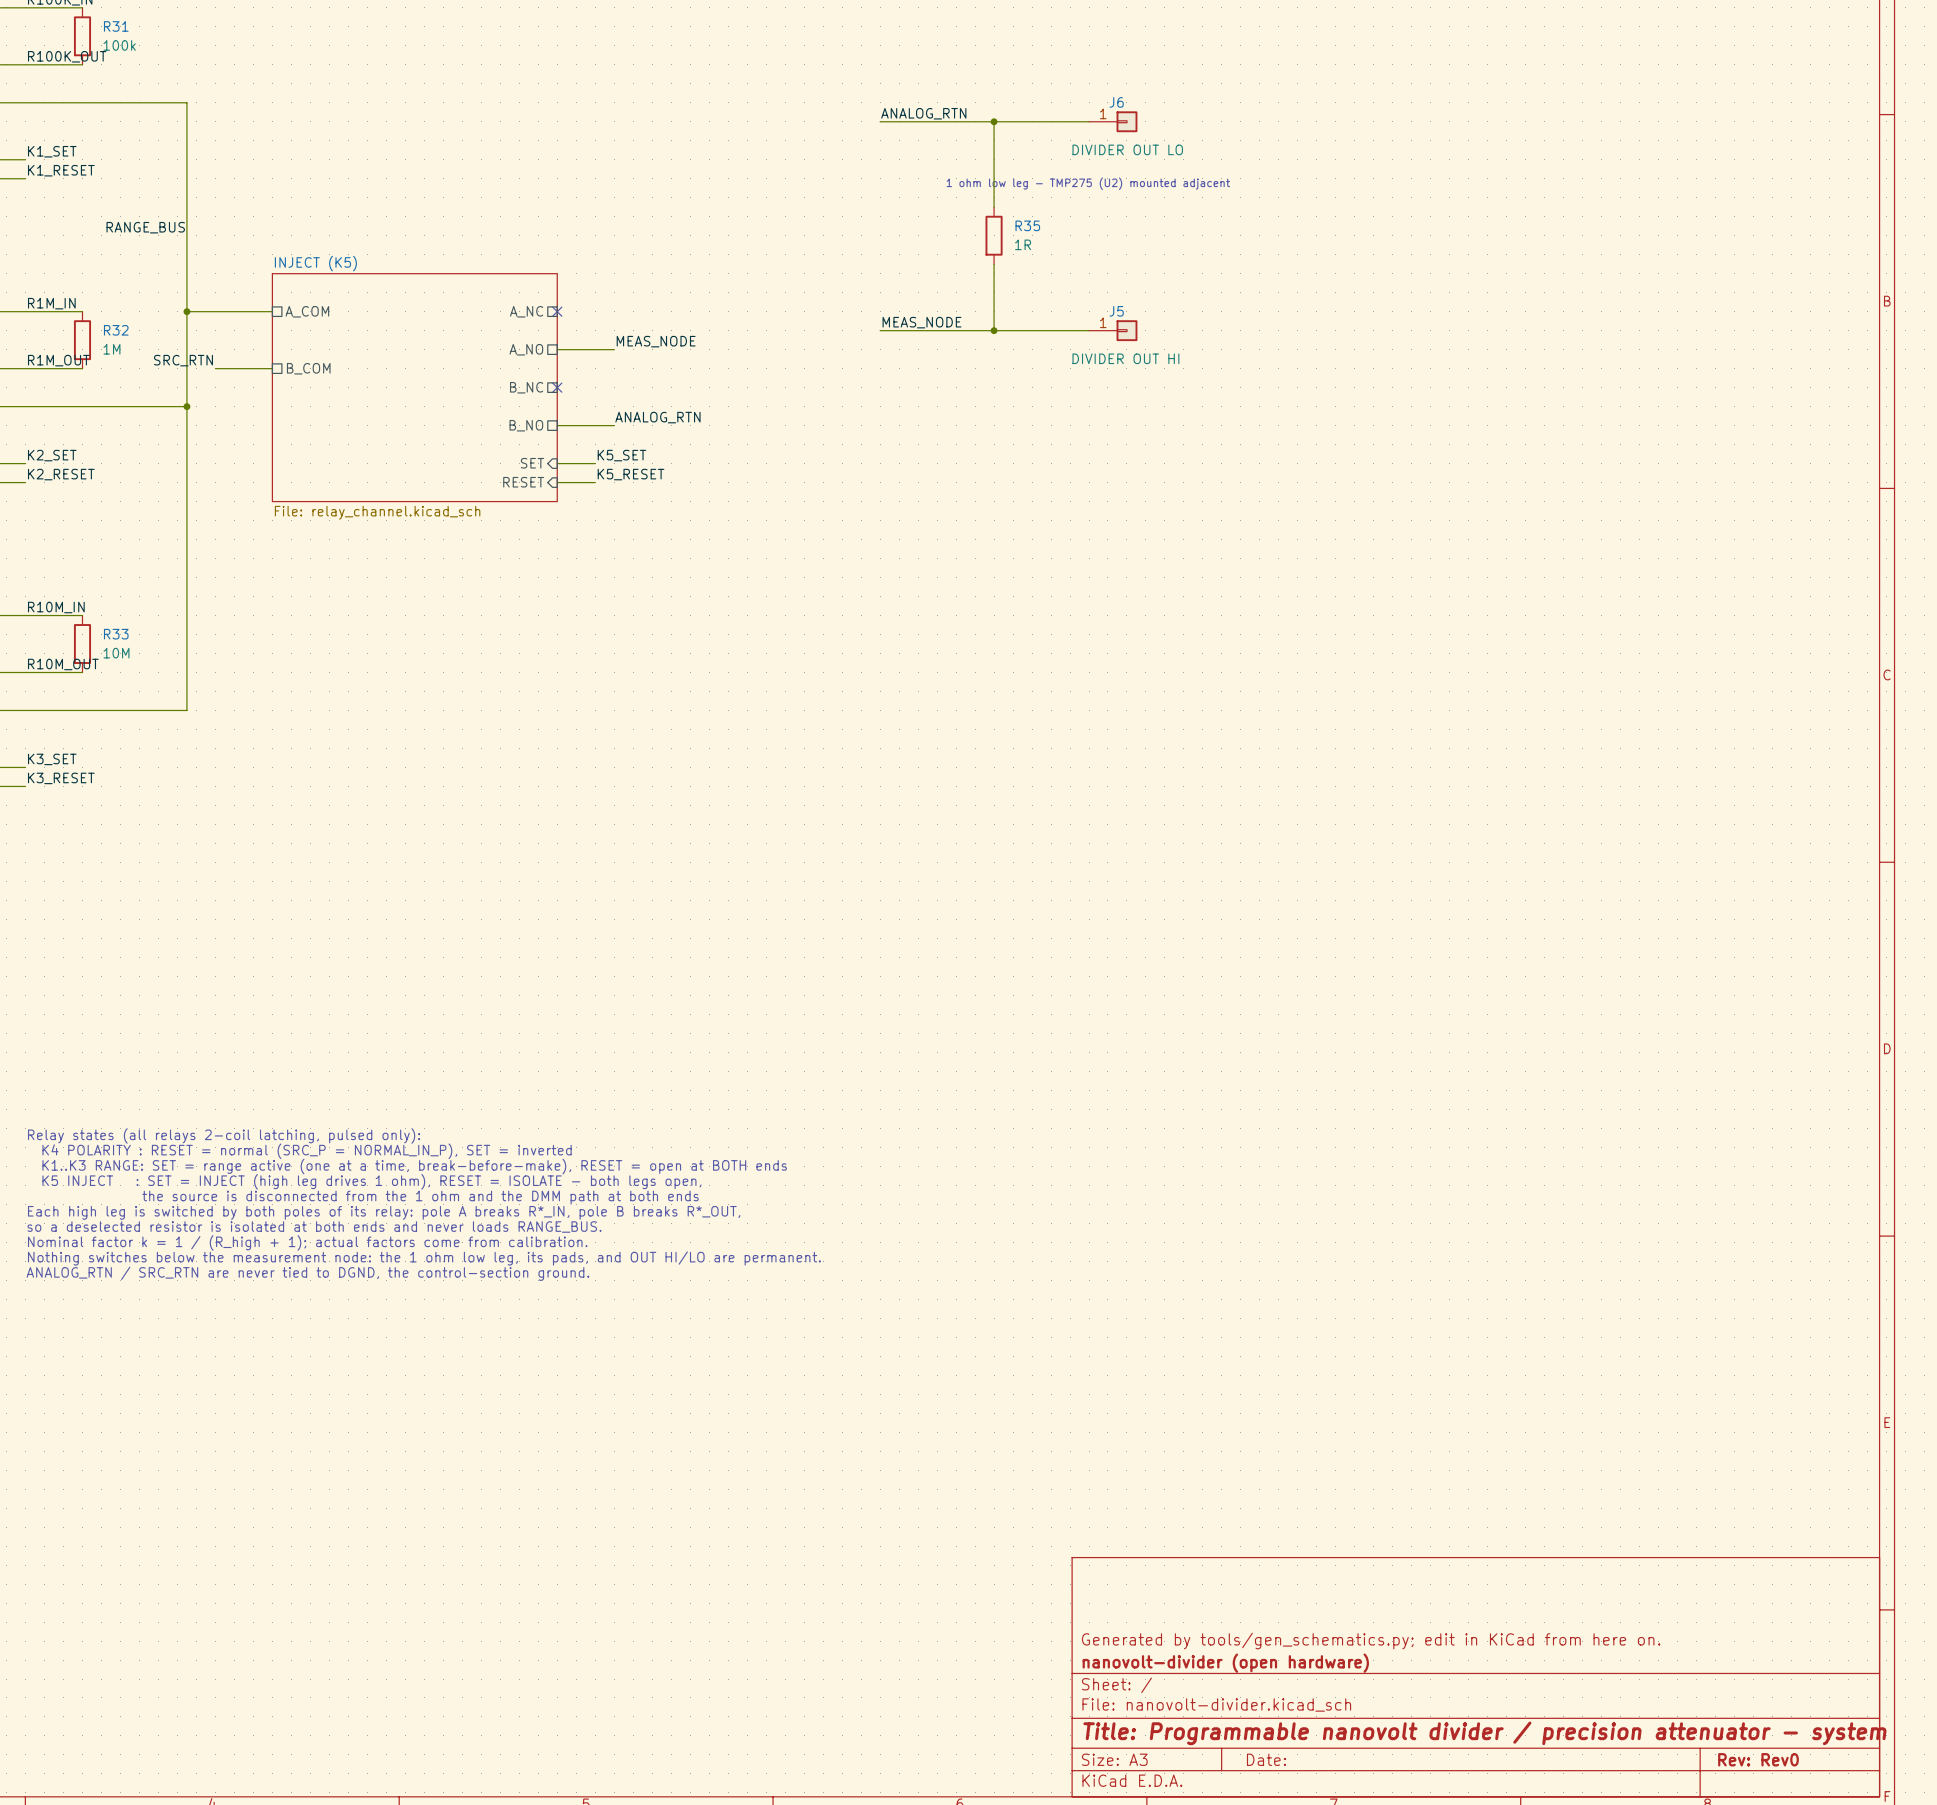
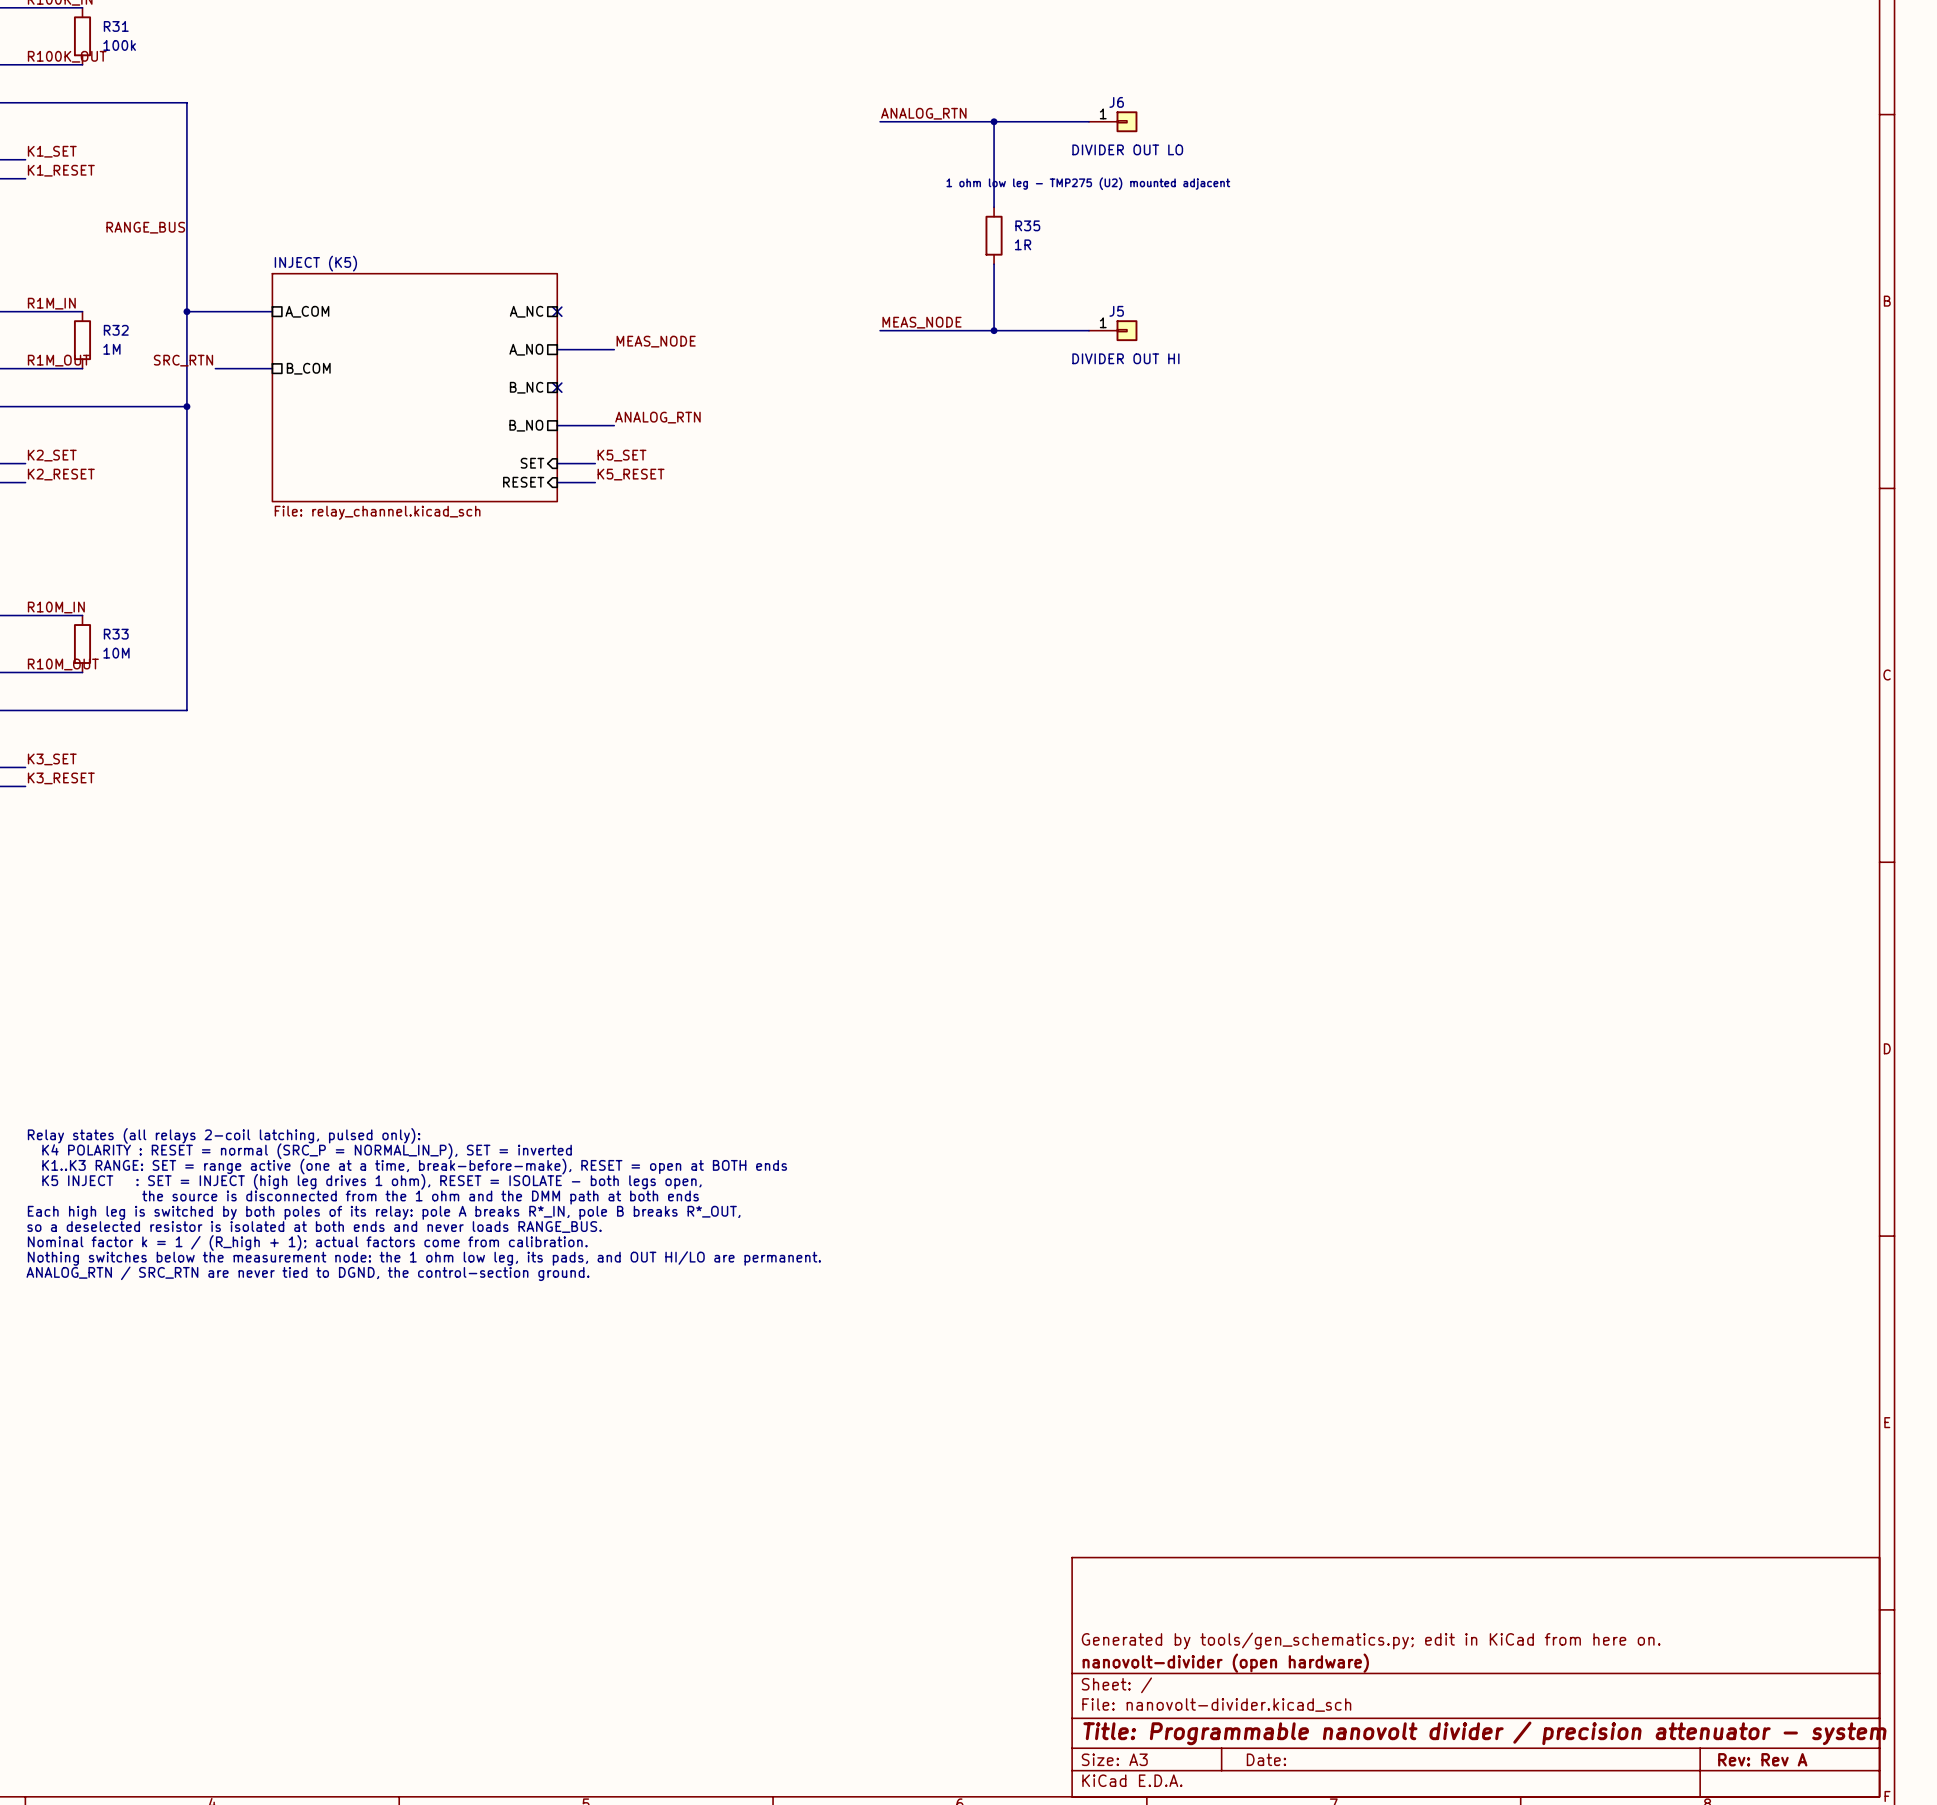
title block: Rev: Rev0 (1758, 1759) -> Rev: Rev A (1762, 1759)

